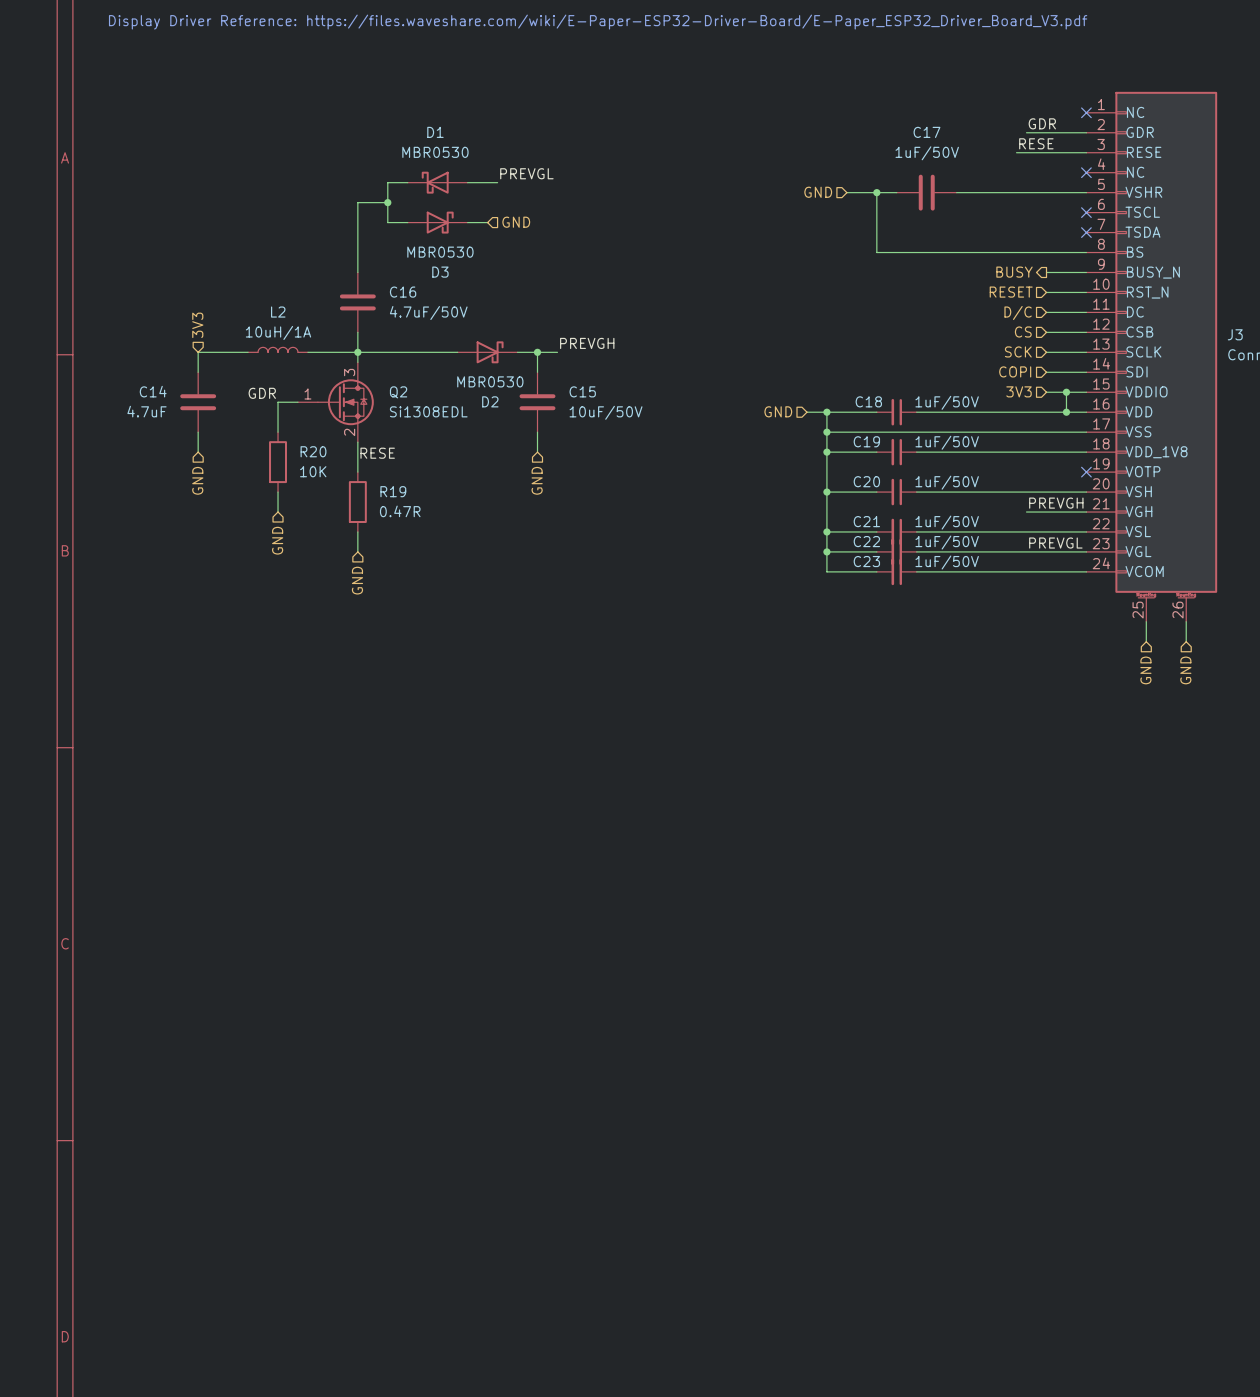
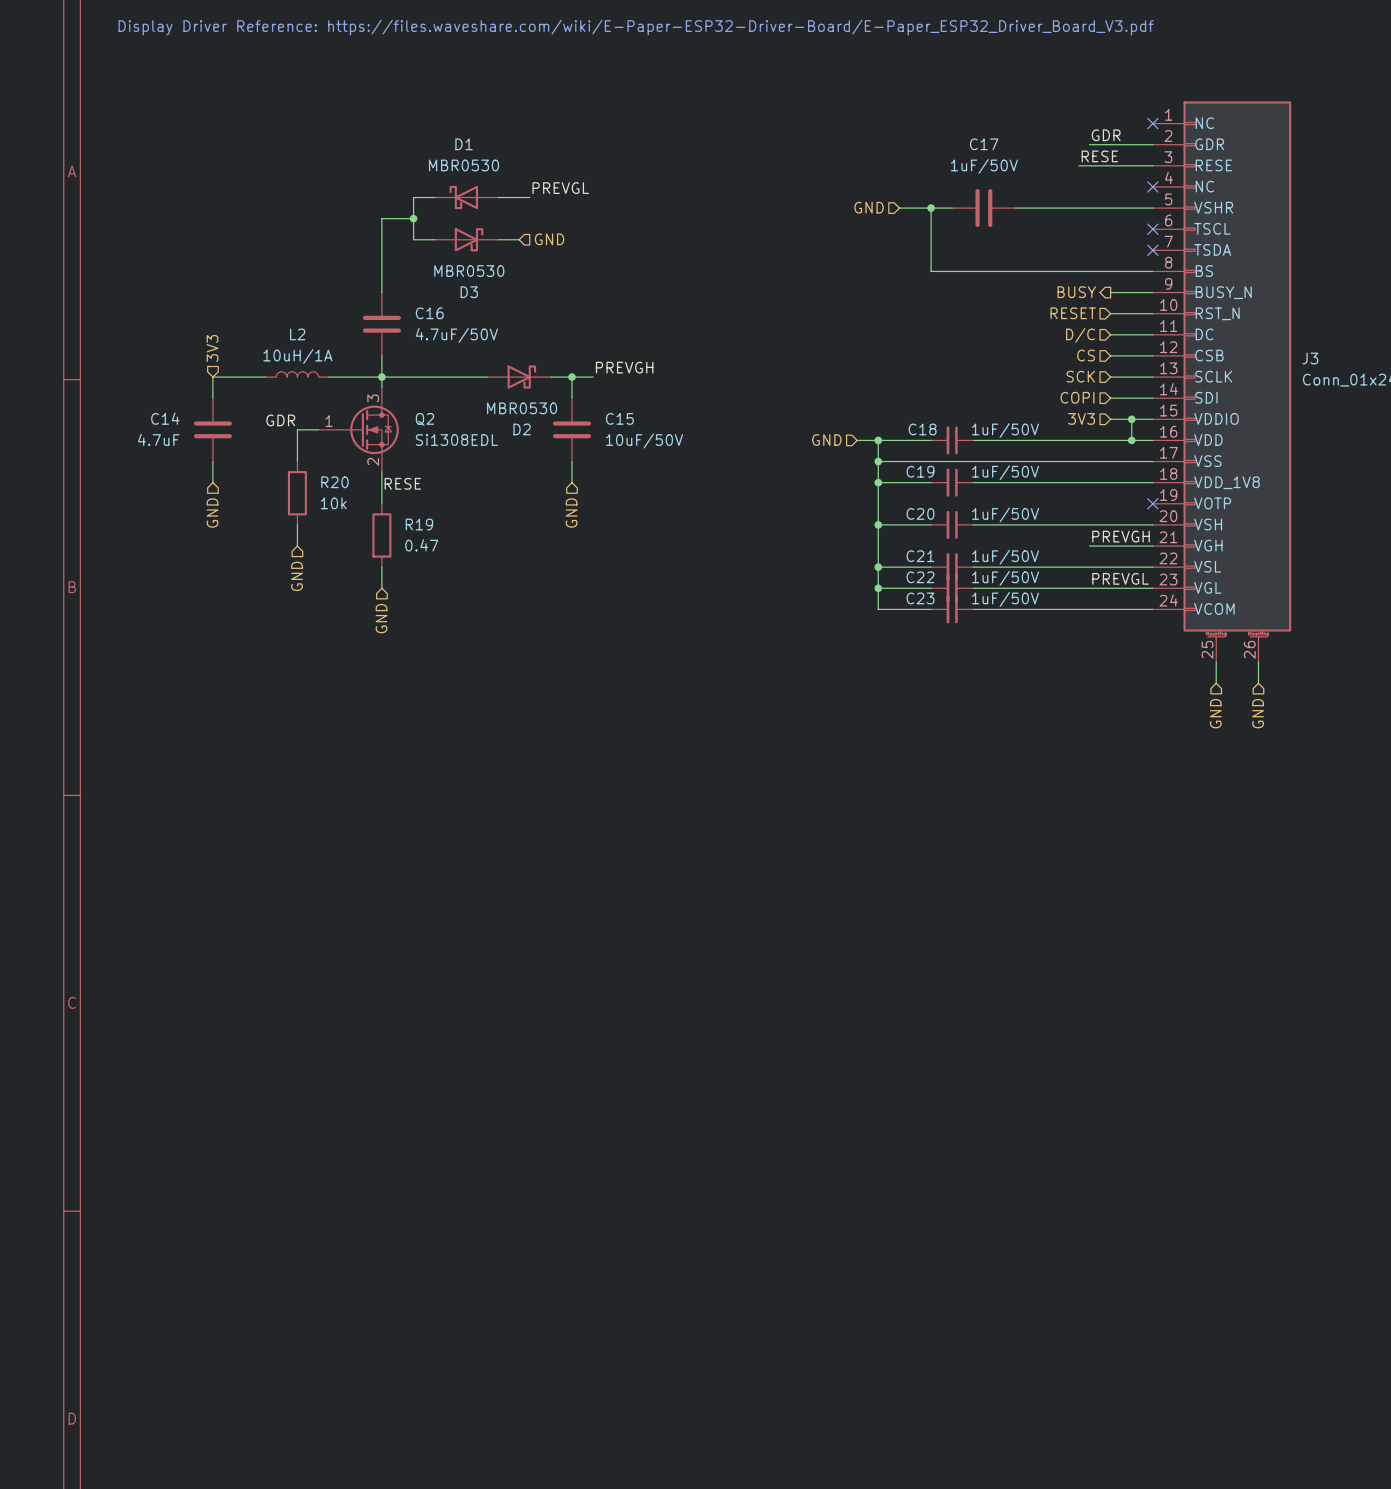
R20 value: 10K (313, 471) -> 10k (333, 503)
R19 value: 0.47R (400, 511) -> 0.47 (421, 545)

